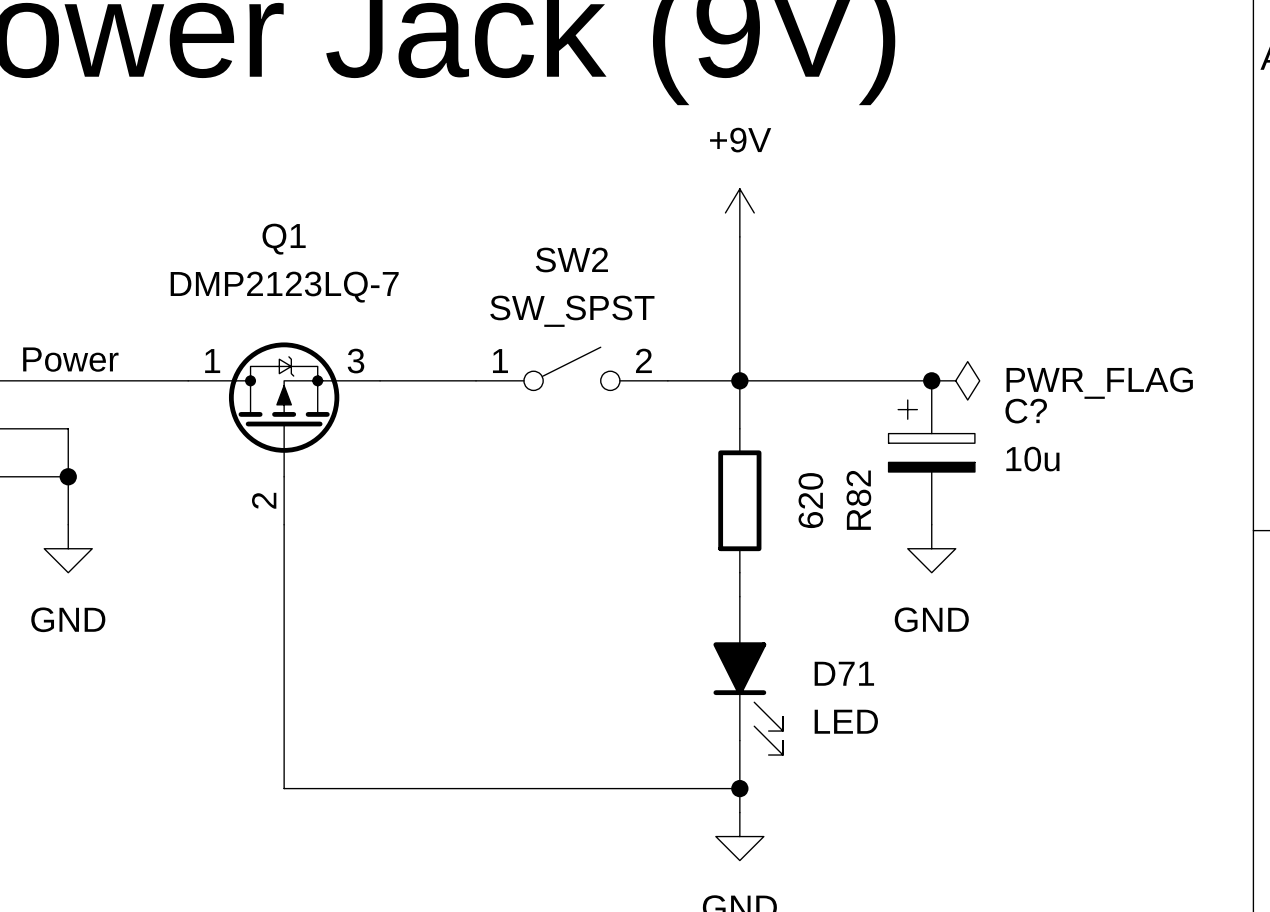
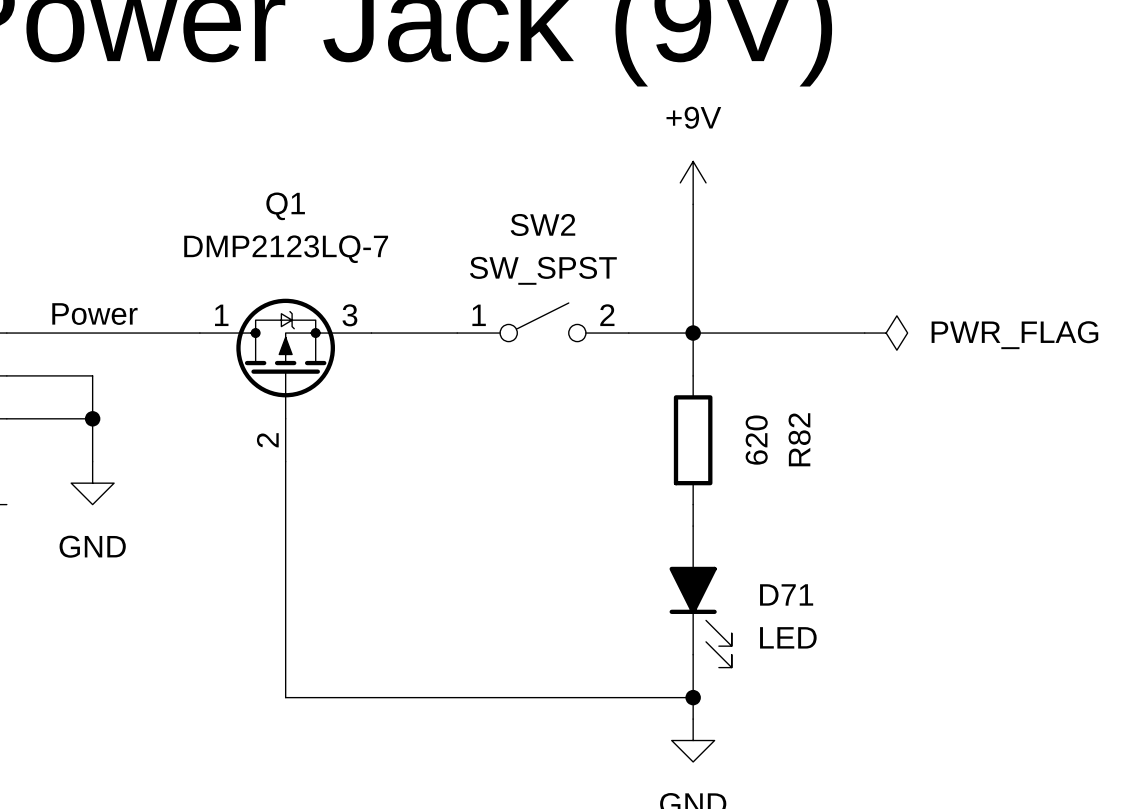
junction: (931, 380) -> none
C?: 10u (931, 452) -> none
power symbol: GND (931, 548) -> none

